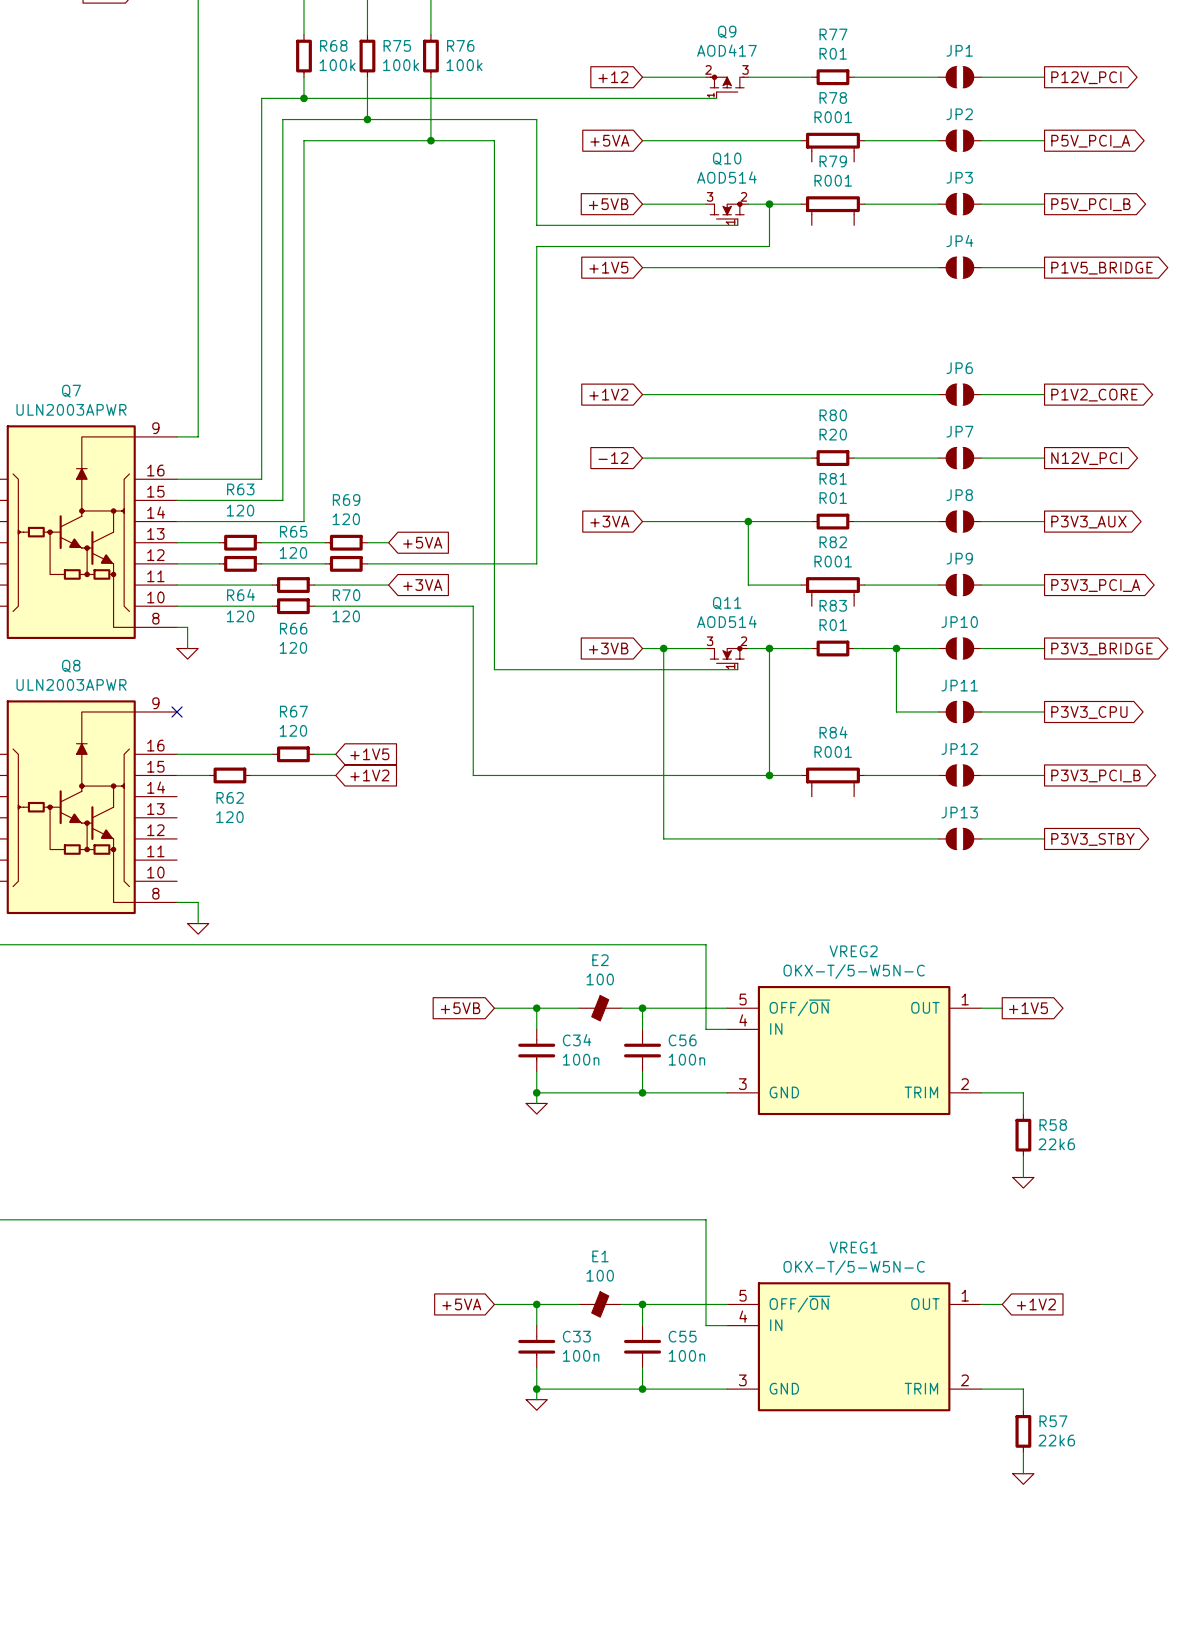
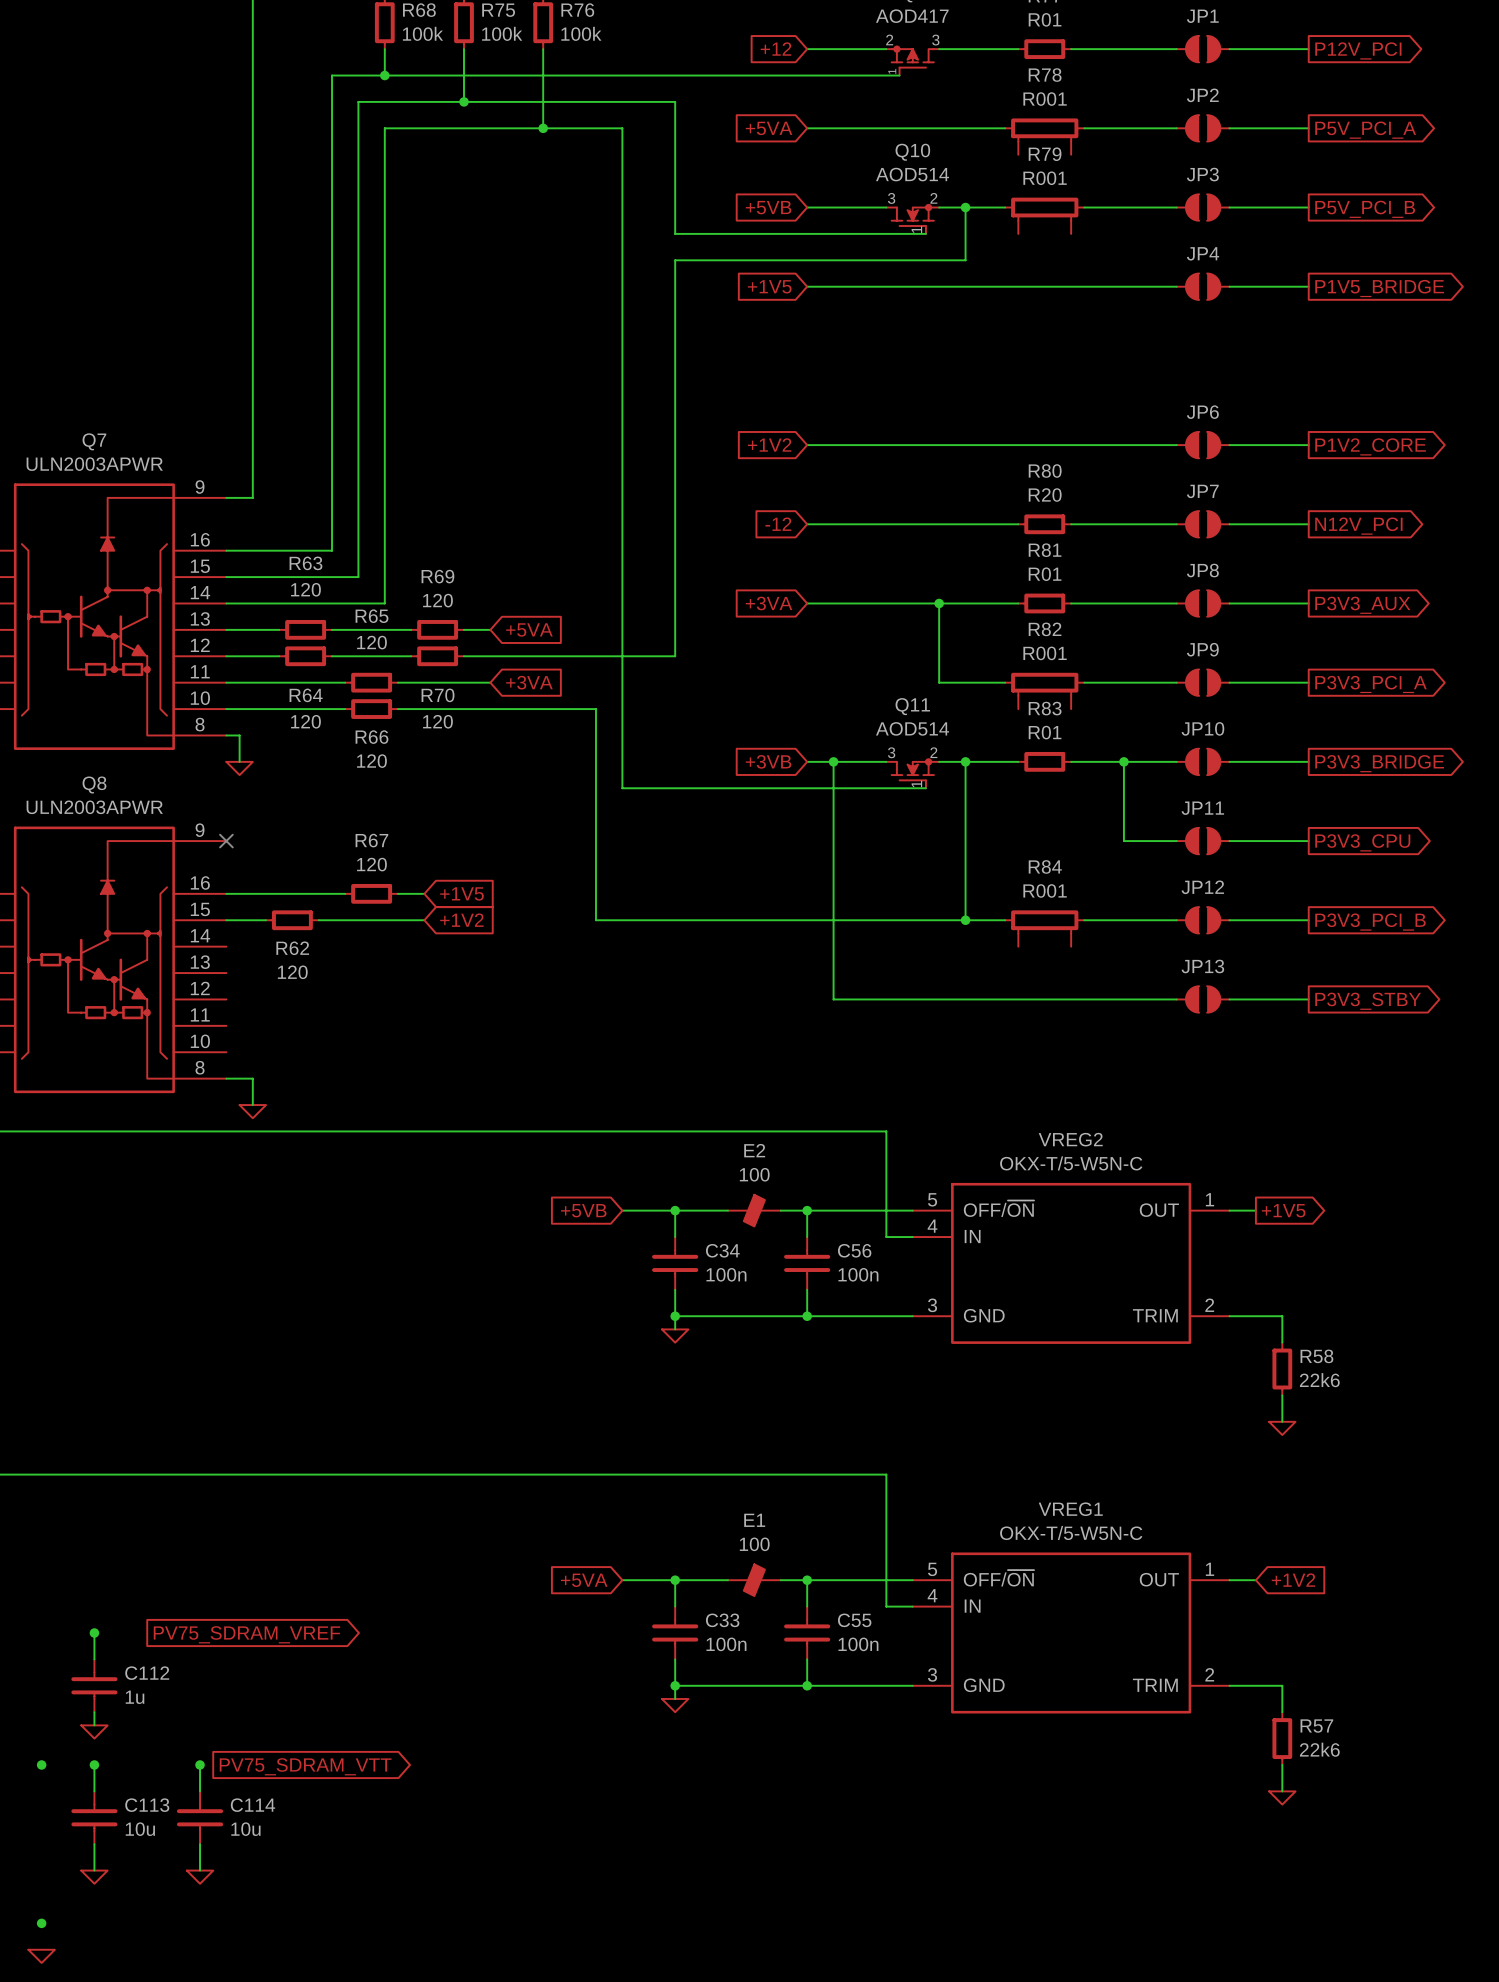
wire: none -> (94, 1632) (94, 1659)
junction: none -> (94, 1632)
global label: none -> PV75_SDRAM_VREF (246, 1634)
C112: none -> 1u (94, 1685)
wire: none -> (94, 1712) (94, 1725)
power symbol: none -> (94, 1731)
junction: none -> (41, 1764)
wire: none -> (94, 1764) (94, 1791)
junction: none -> (94, 1764)
wire: none -> (200, 1764) (200, 1791)
junction: none -> (200, 1764)
global label: none -> PV75_SDRAM_VTT (305, 1766)
C113: none -> 10u (94, 1817)
C114: none -> 10u (200, 1817)
wire: none -> (94, 1844) (94, 1870)
wire: none -> (200, 1844) (200, 1870)
power symbol: none -> (94, 1877)
power symbol: none -> (200, 1877)
junction: none -> (41, 1923)
power symbol: none -> (41, 1956)

